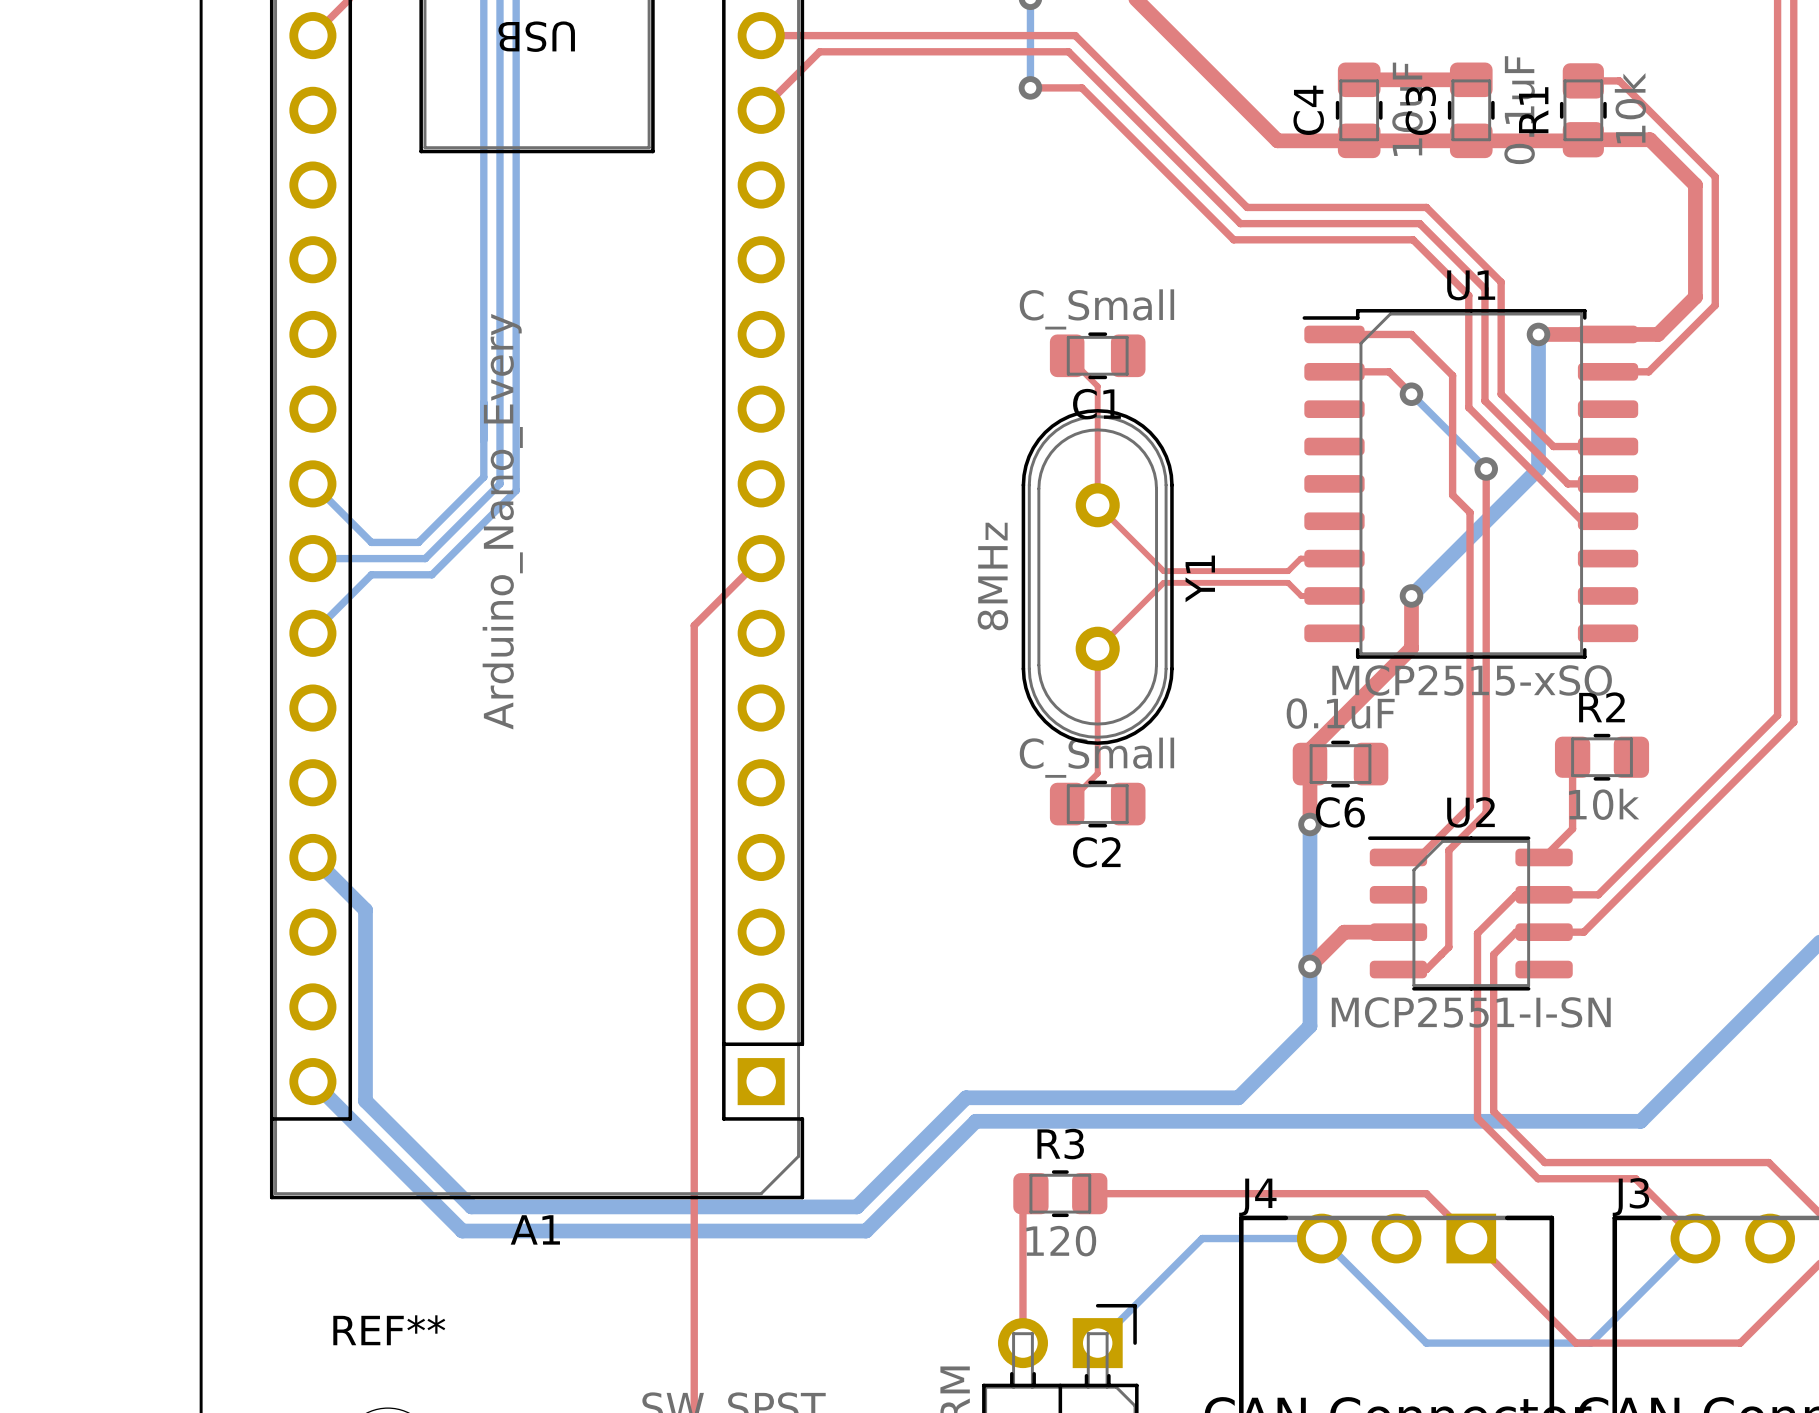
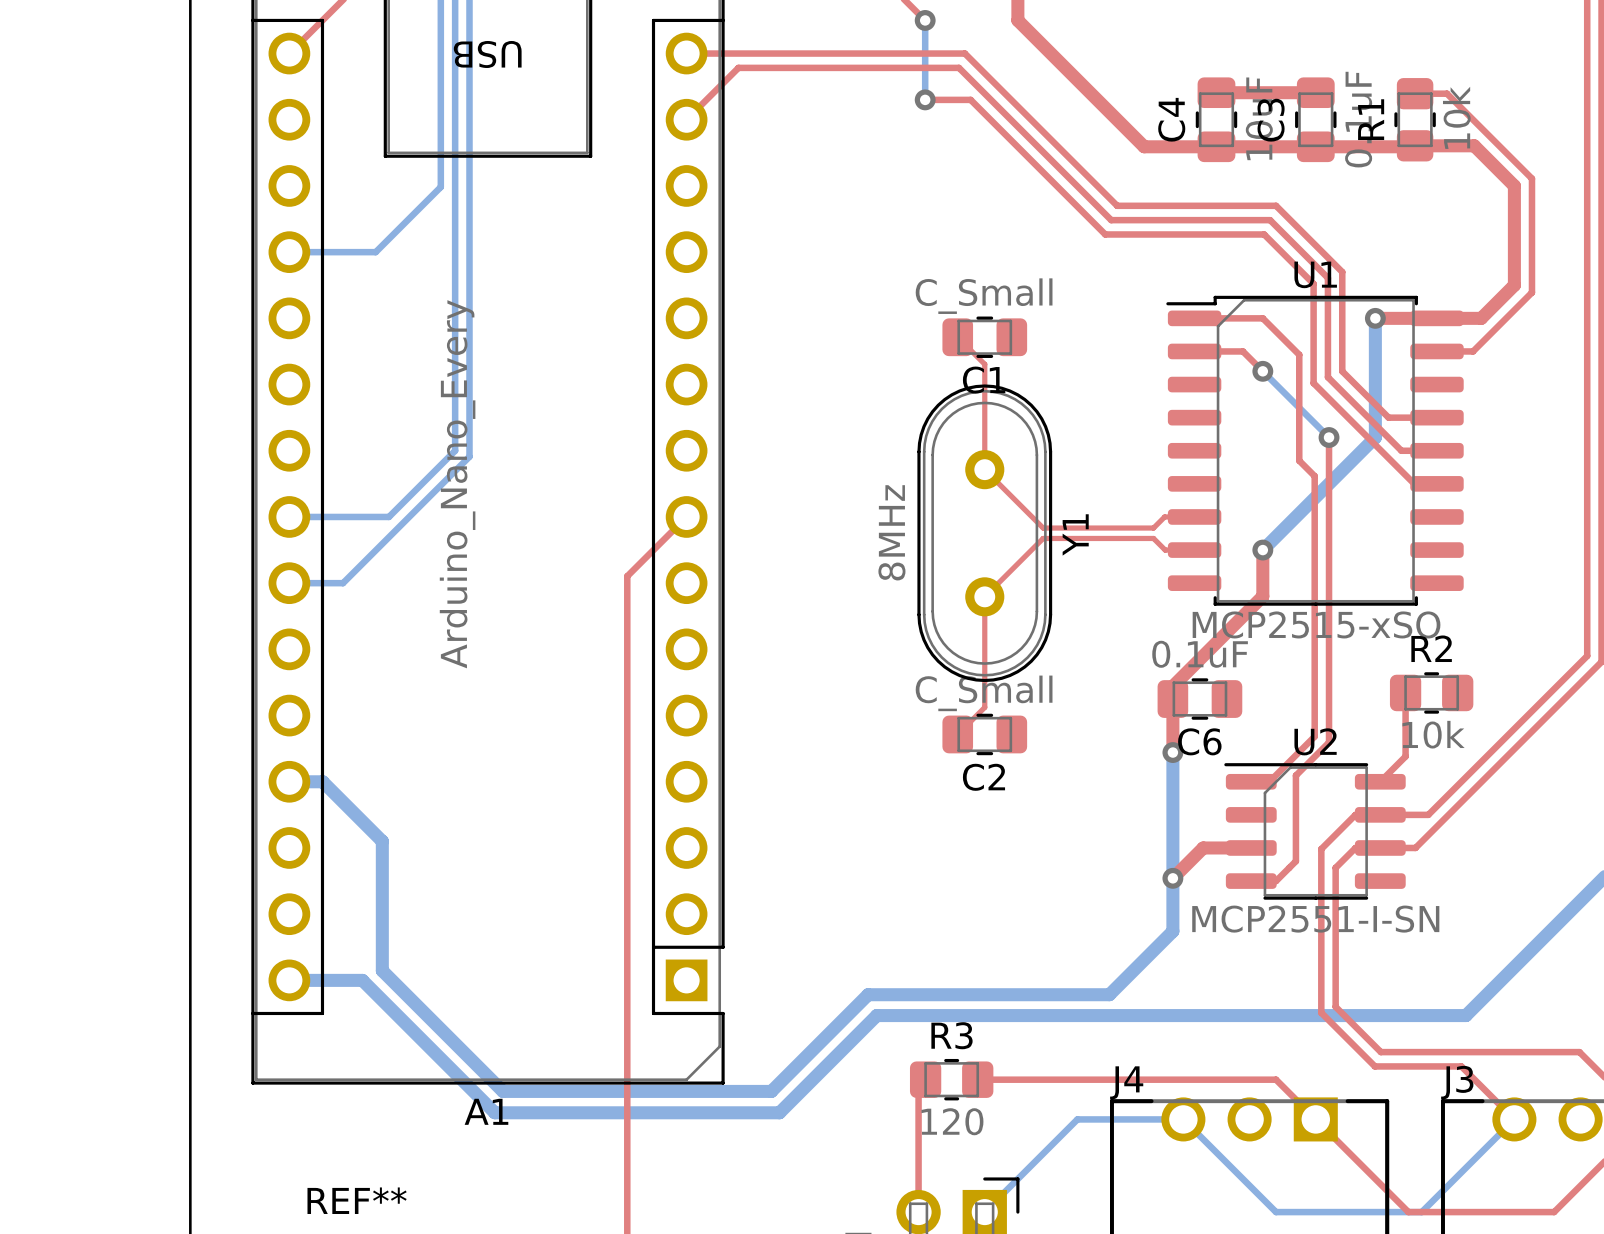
bottom track: (483, 186) (483, 477) (418, 542) (371, 542) (312, 483) -> (440, 187) (375, 252) (289, 252)
bottom track: (431, 574) (371, 574) (312, 633) -> (394, 531) (343, 583) (289, 583)
bottom track: (312, 857) (365, 910) (365, 1100) (471, 1206) (553, 1206) -> (289, 781) (322, 781) (382, 841) (382, 970) (503, 1091)
bottom track: (312, 1081) (462, 1231) (544, 1231) -> (289, 980) (362, 980) (494, 1112)

